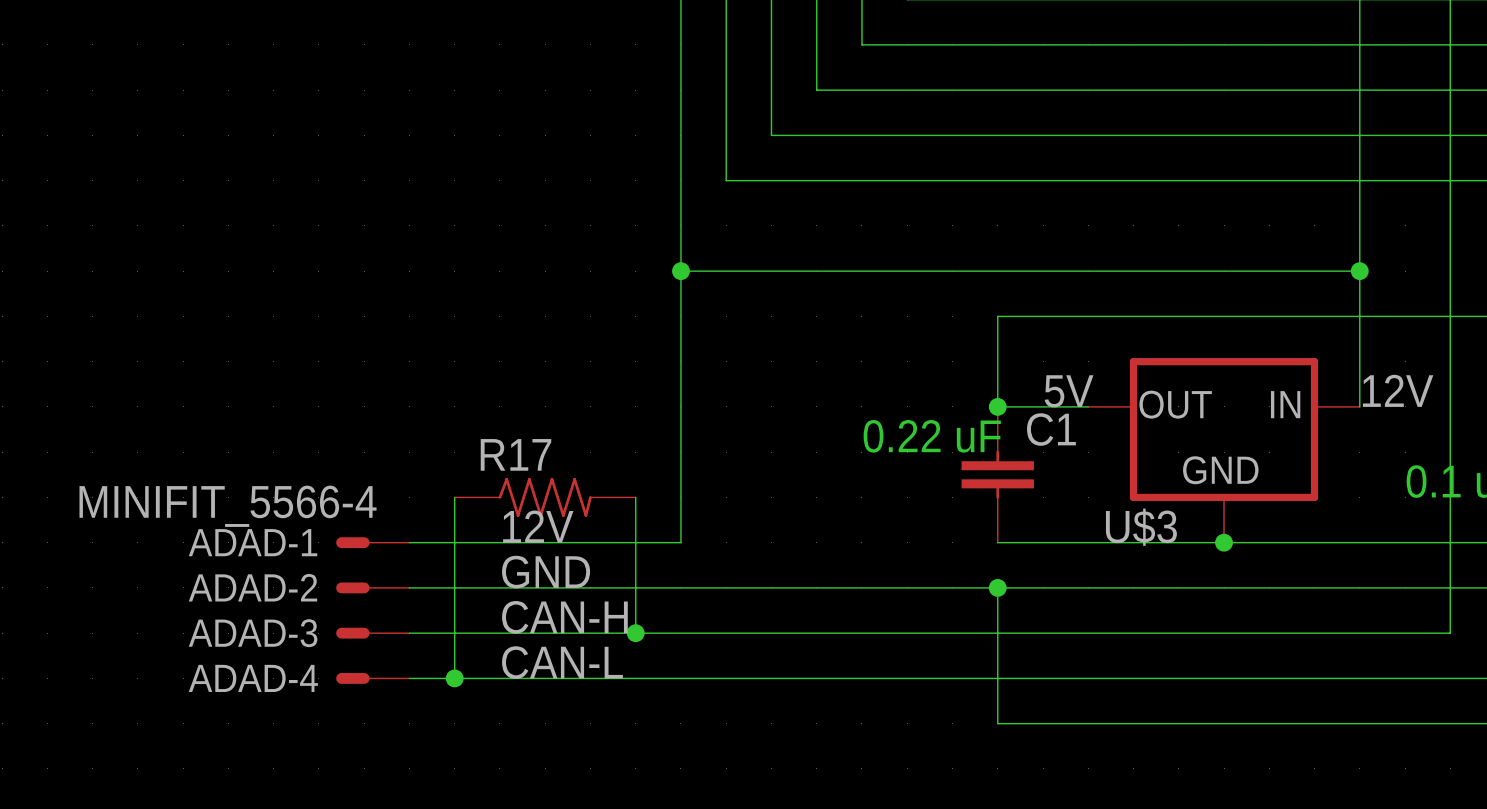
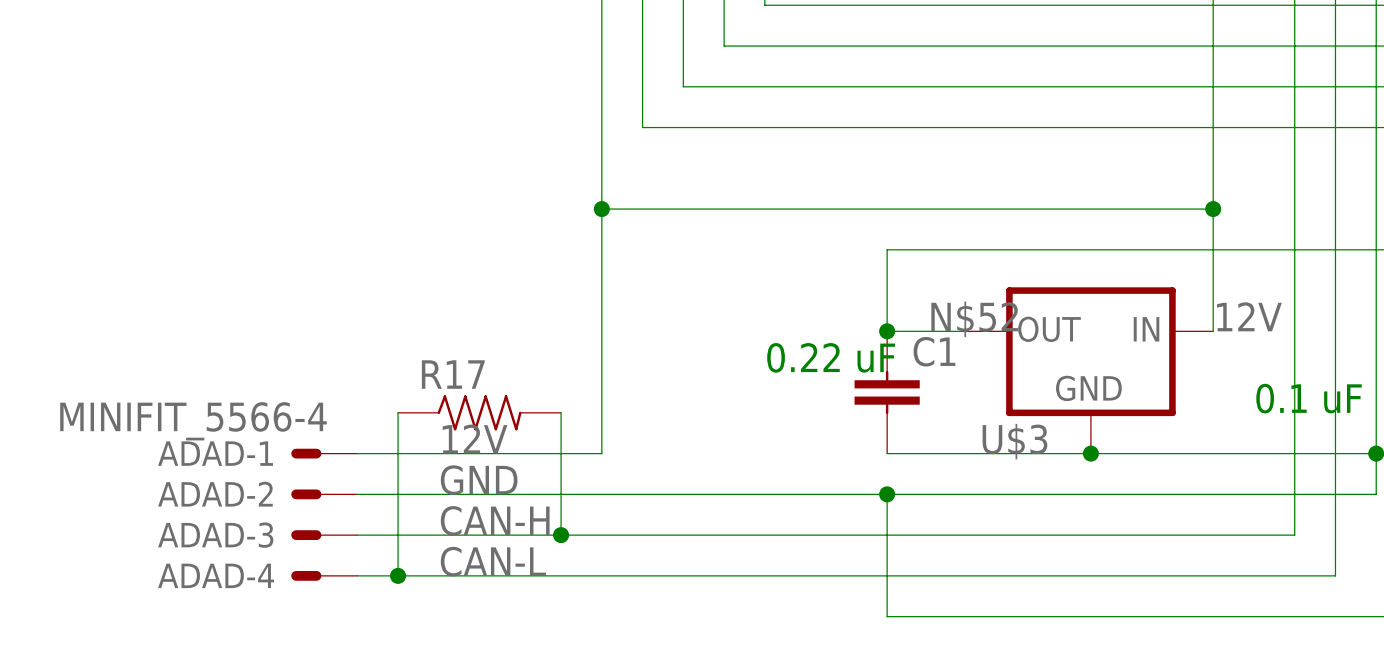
label: 5V (1069, 391) -> N$52 (974, 319)

